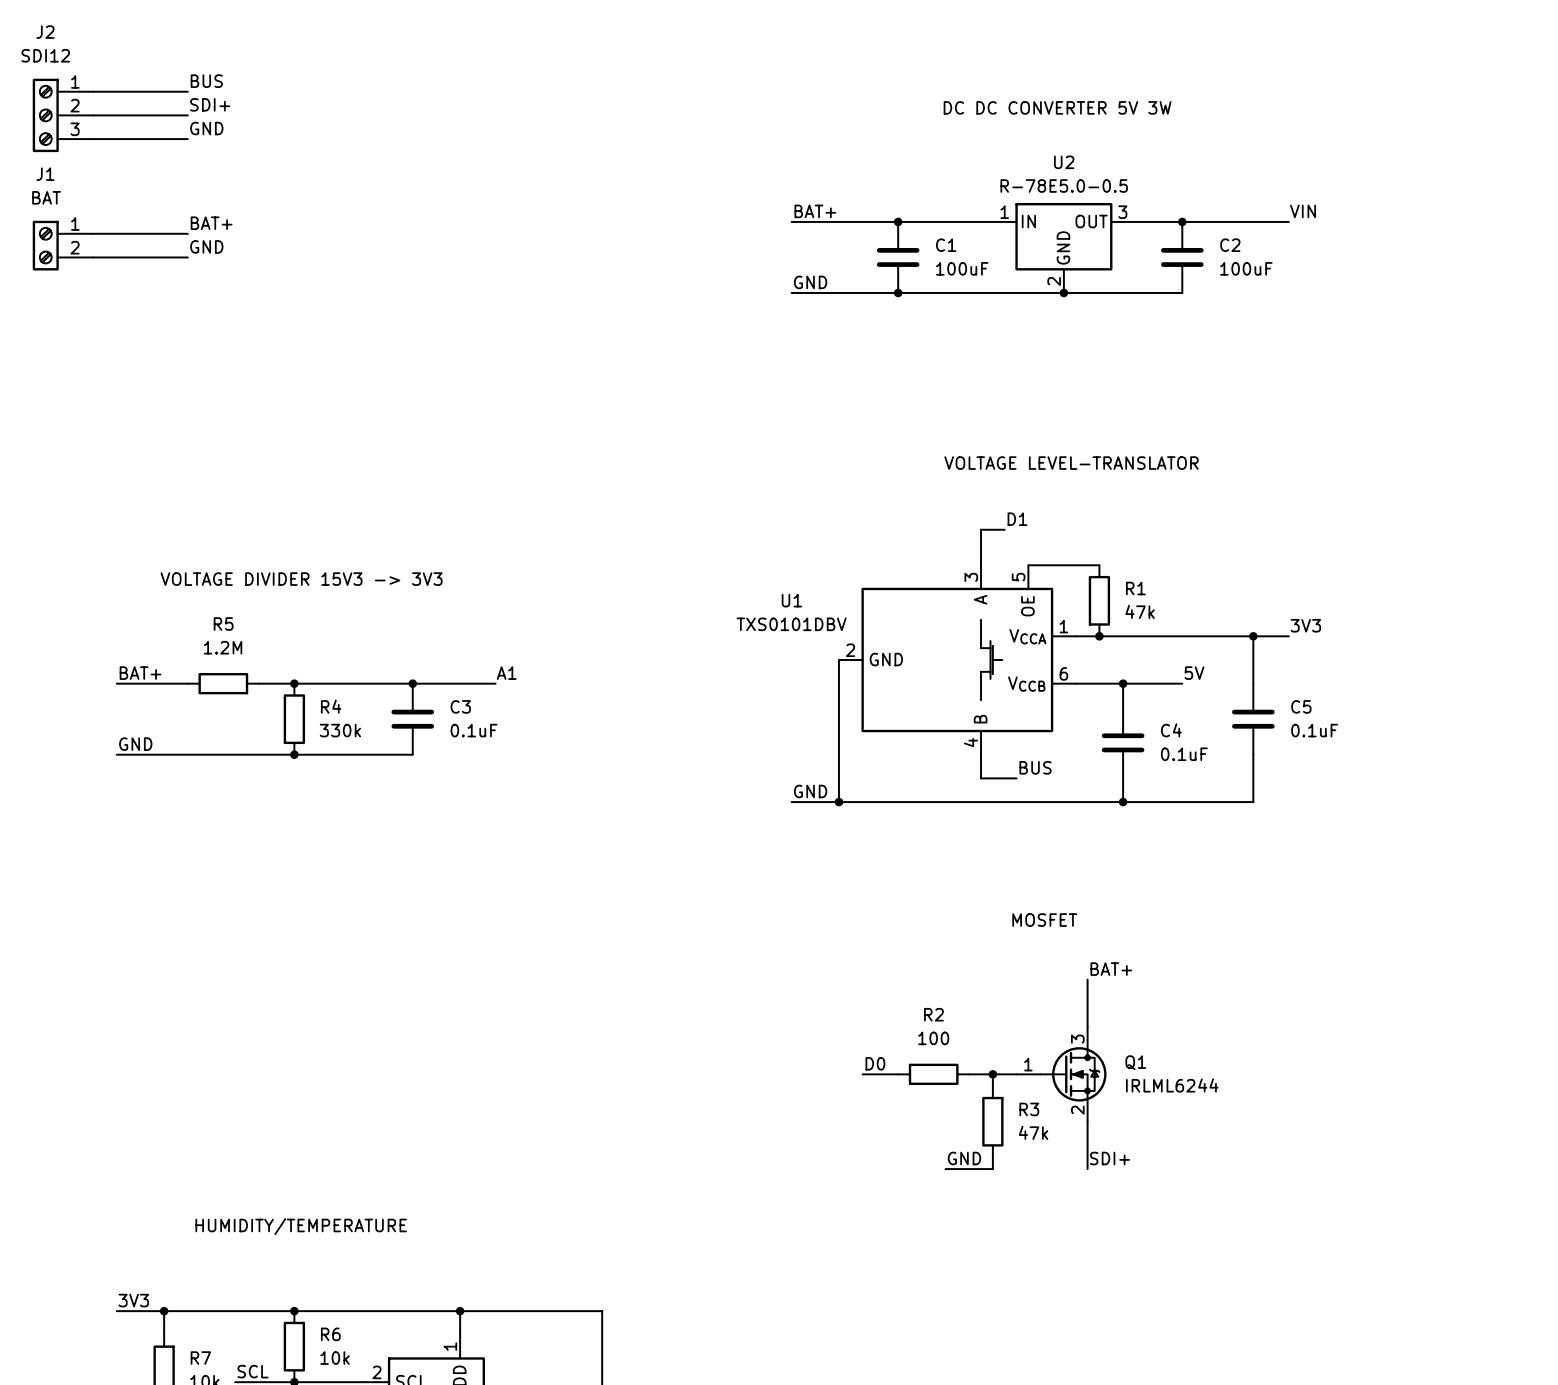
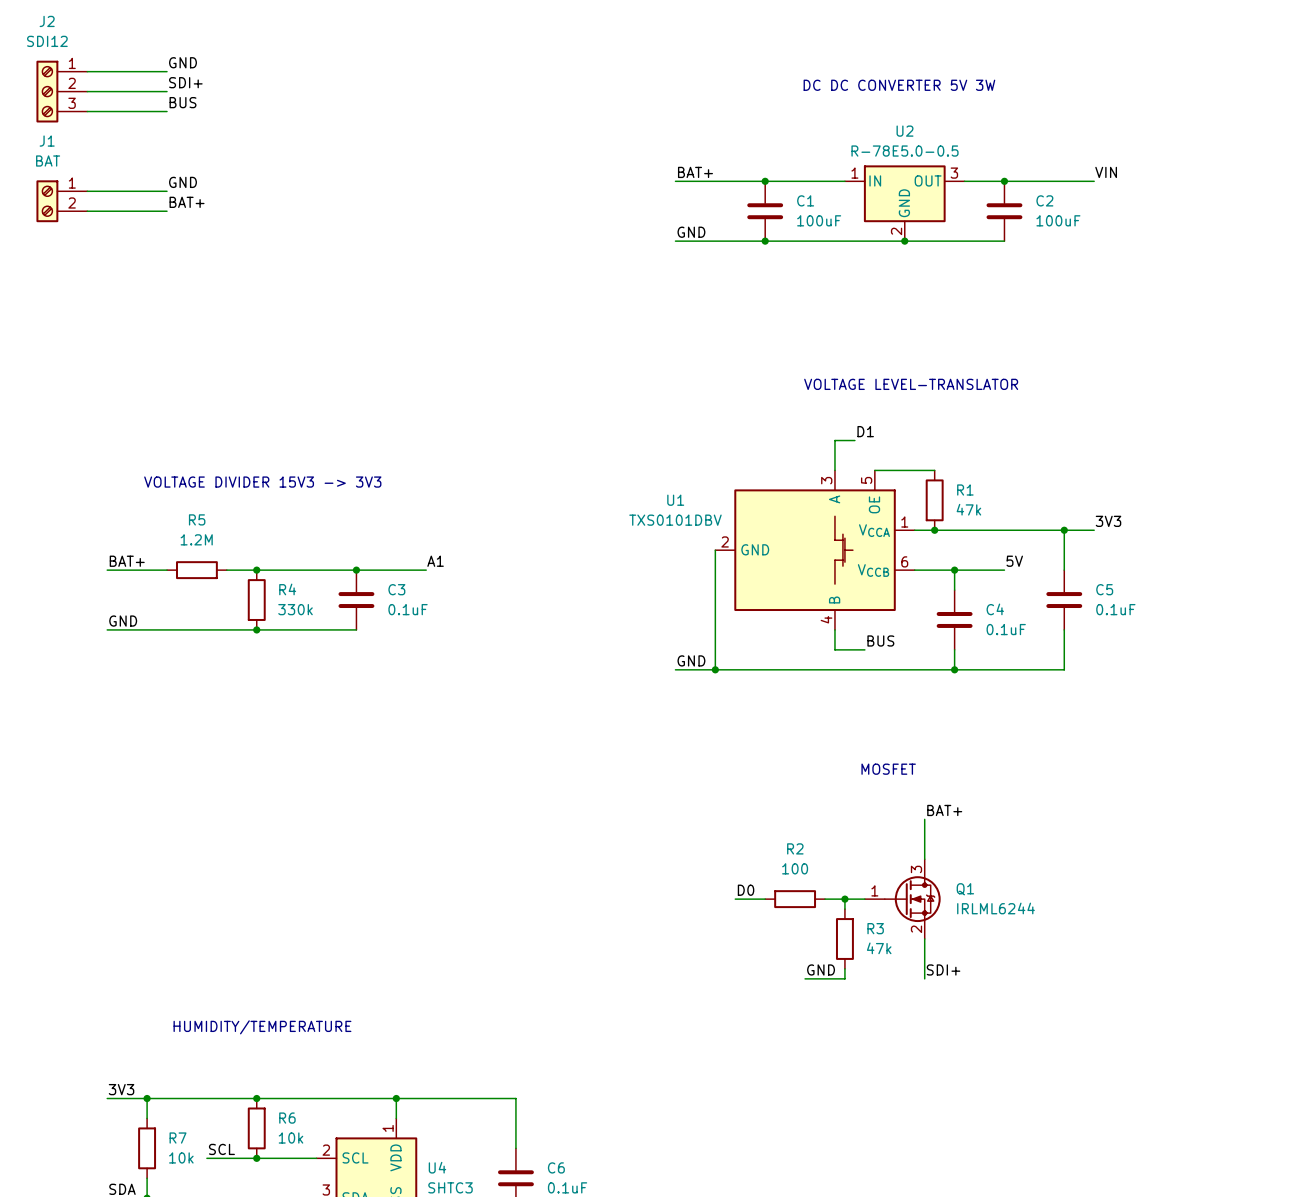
label: BUS (206, 81) -> GND (183, 62)
label: GND (206, 128) -> BUS (183, 102)
label: BAT+ (211, 223) -> GND (183, 182)
label: GND (206, 246) -> BAT+ (187, 202)

